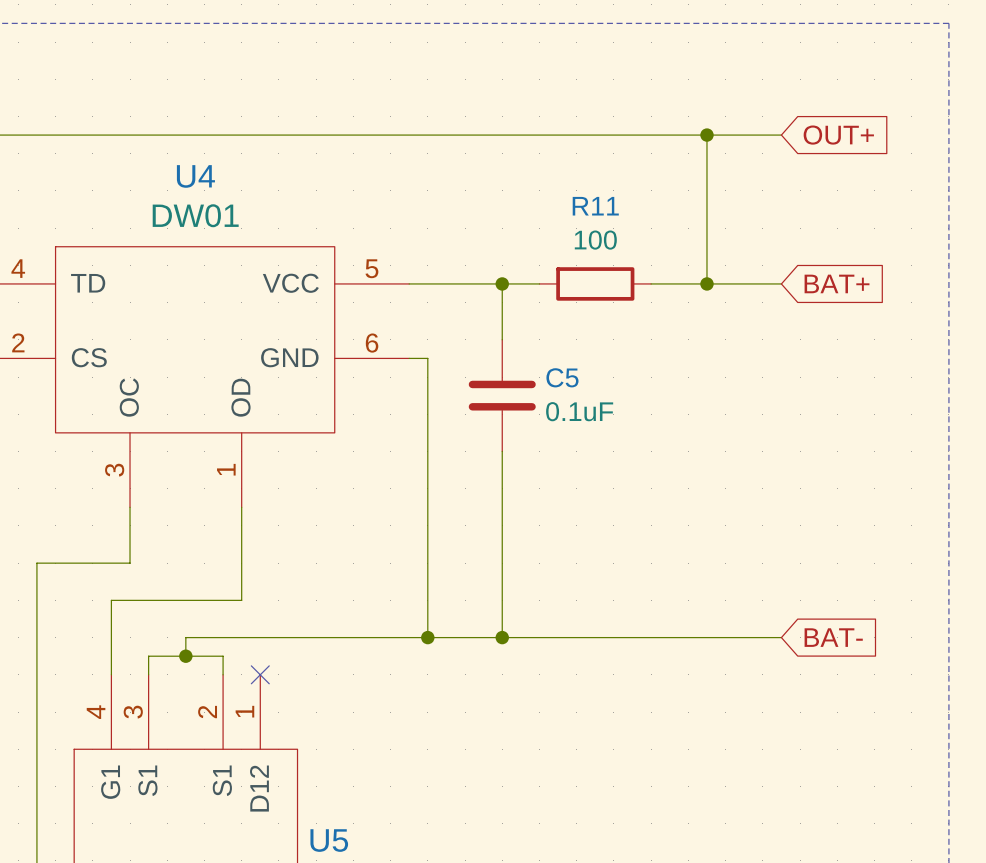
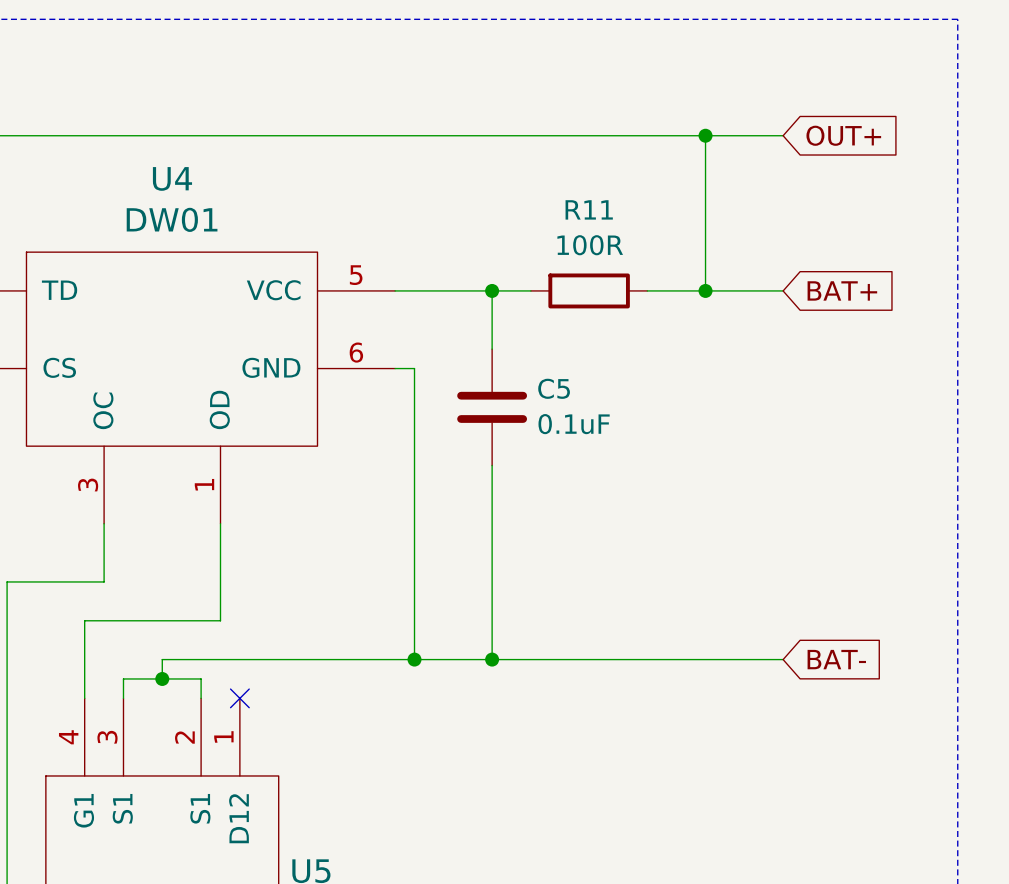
R11 value: 100 (595, 240) -> 100R (590, 245)

